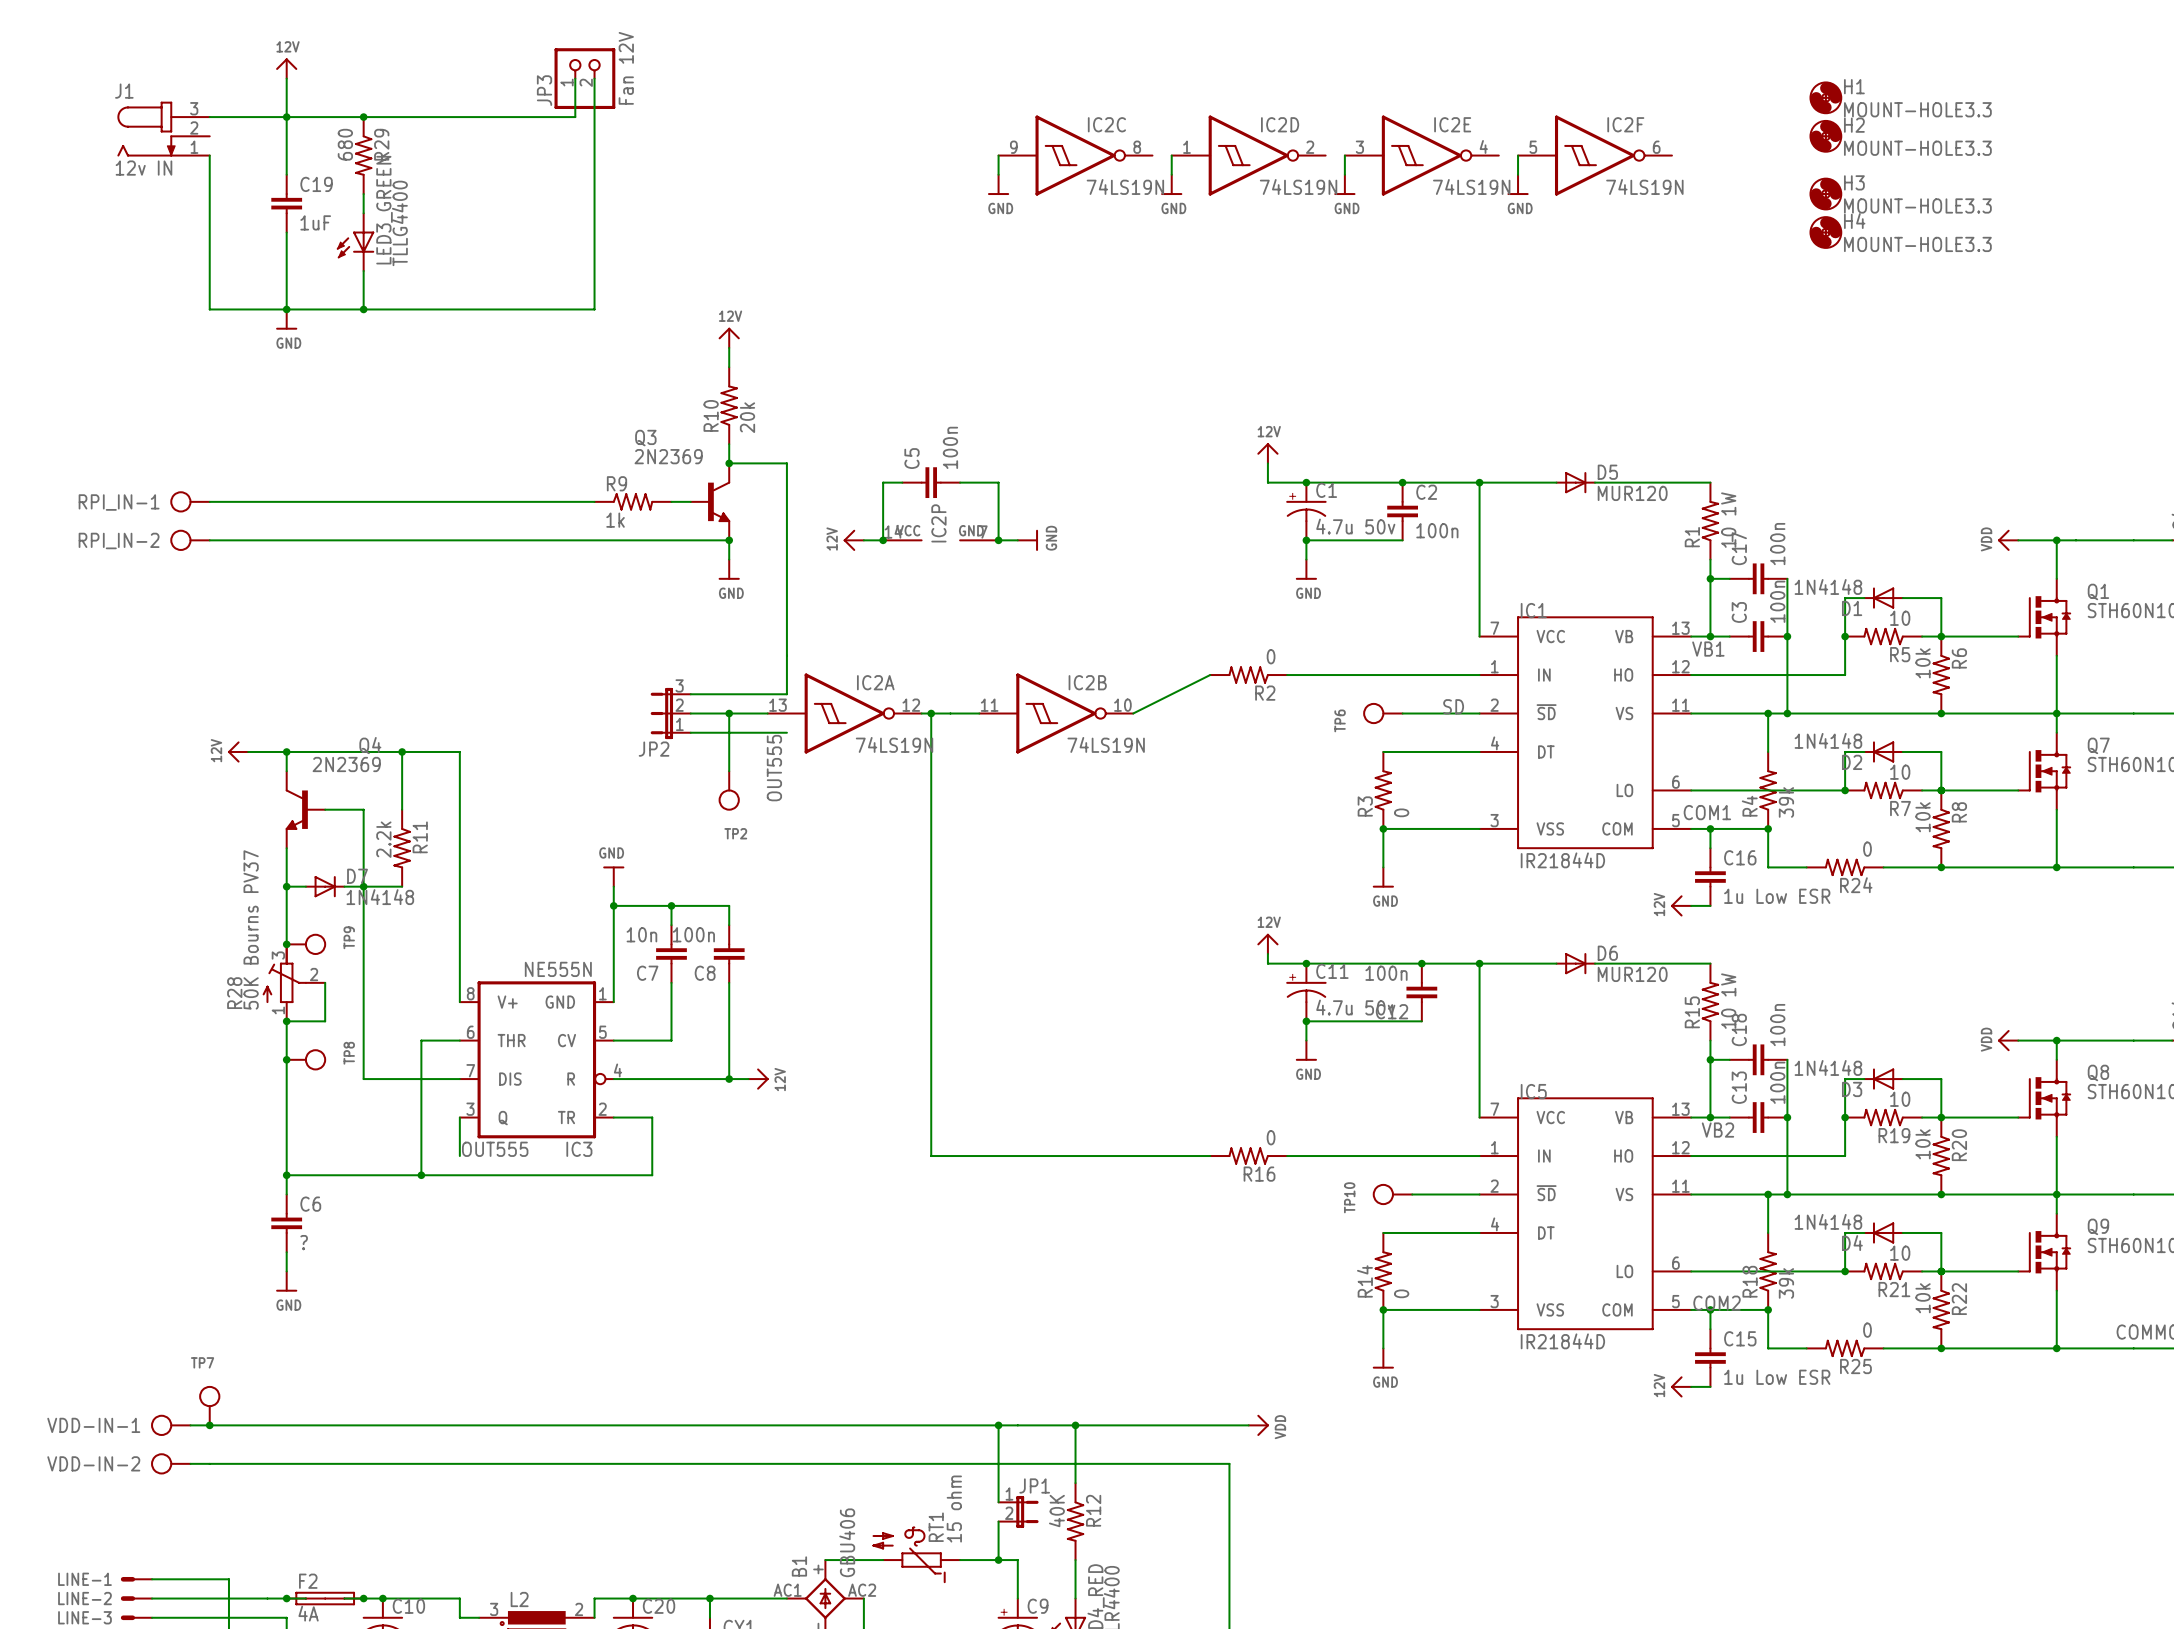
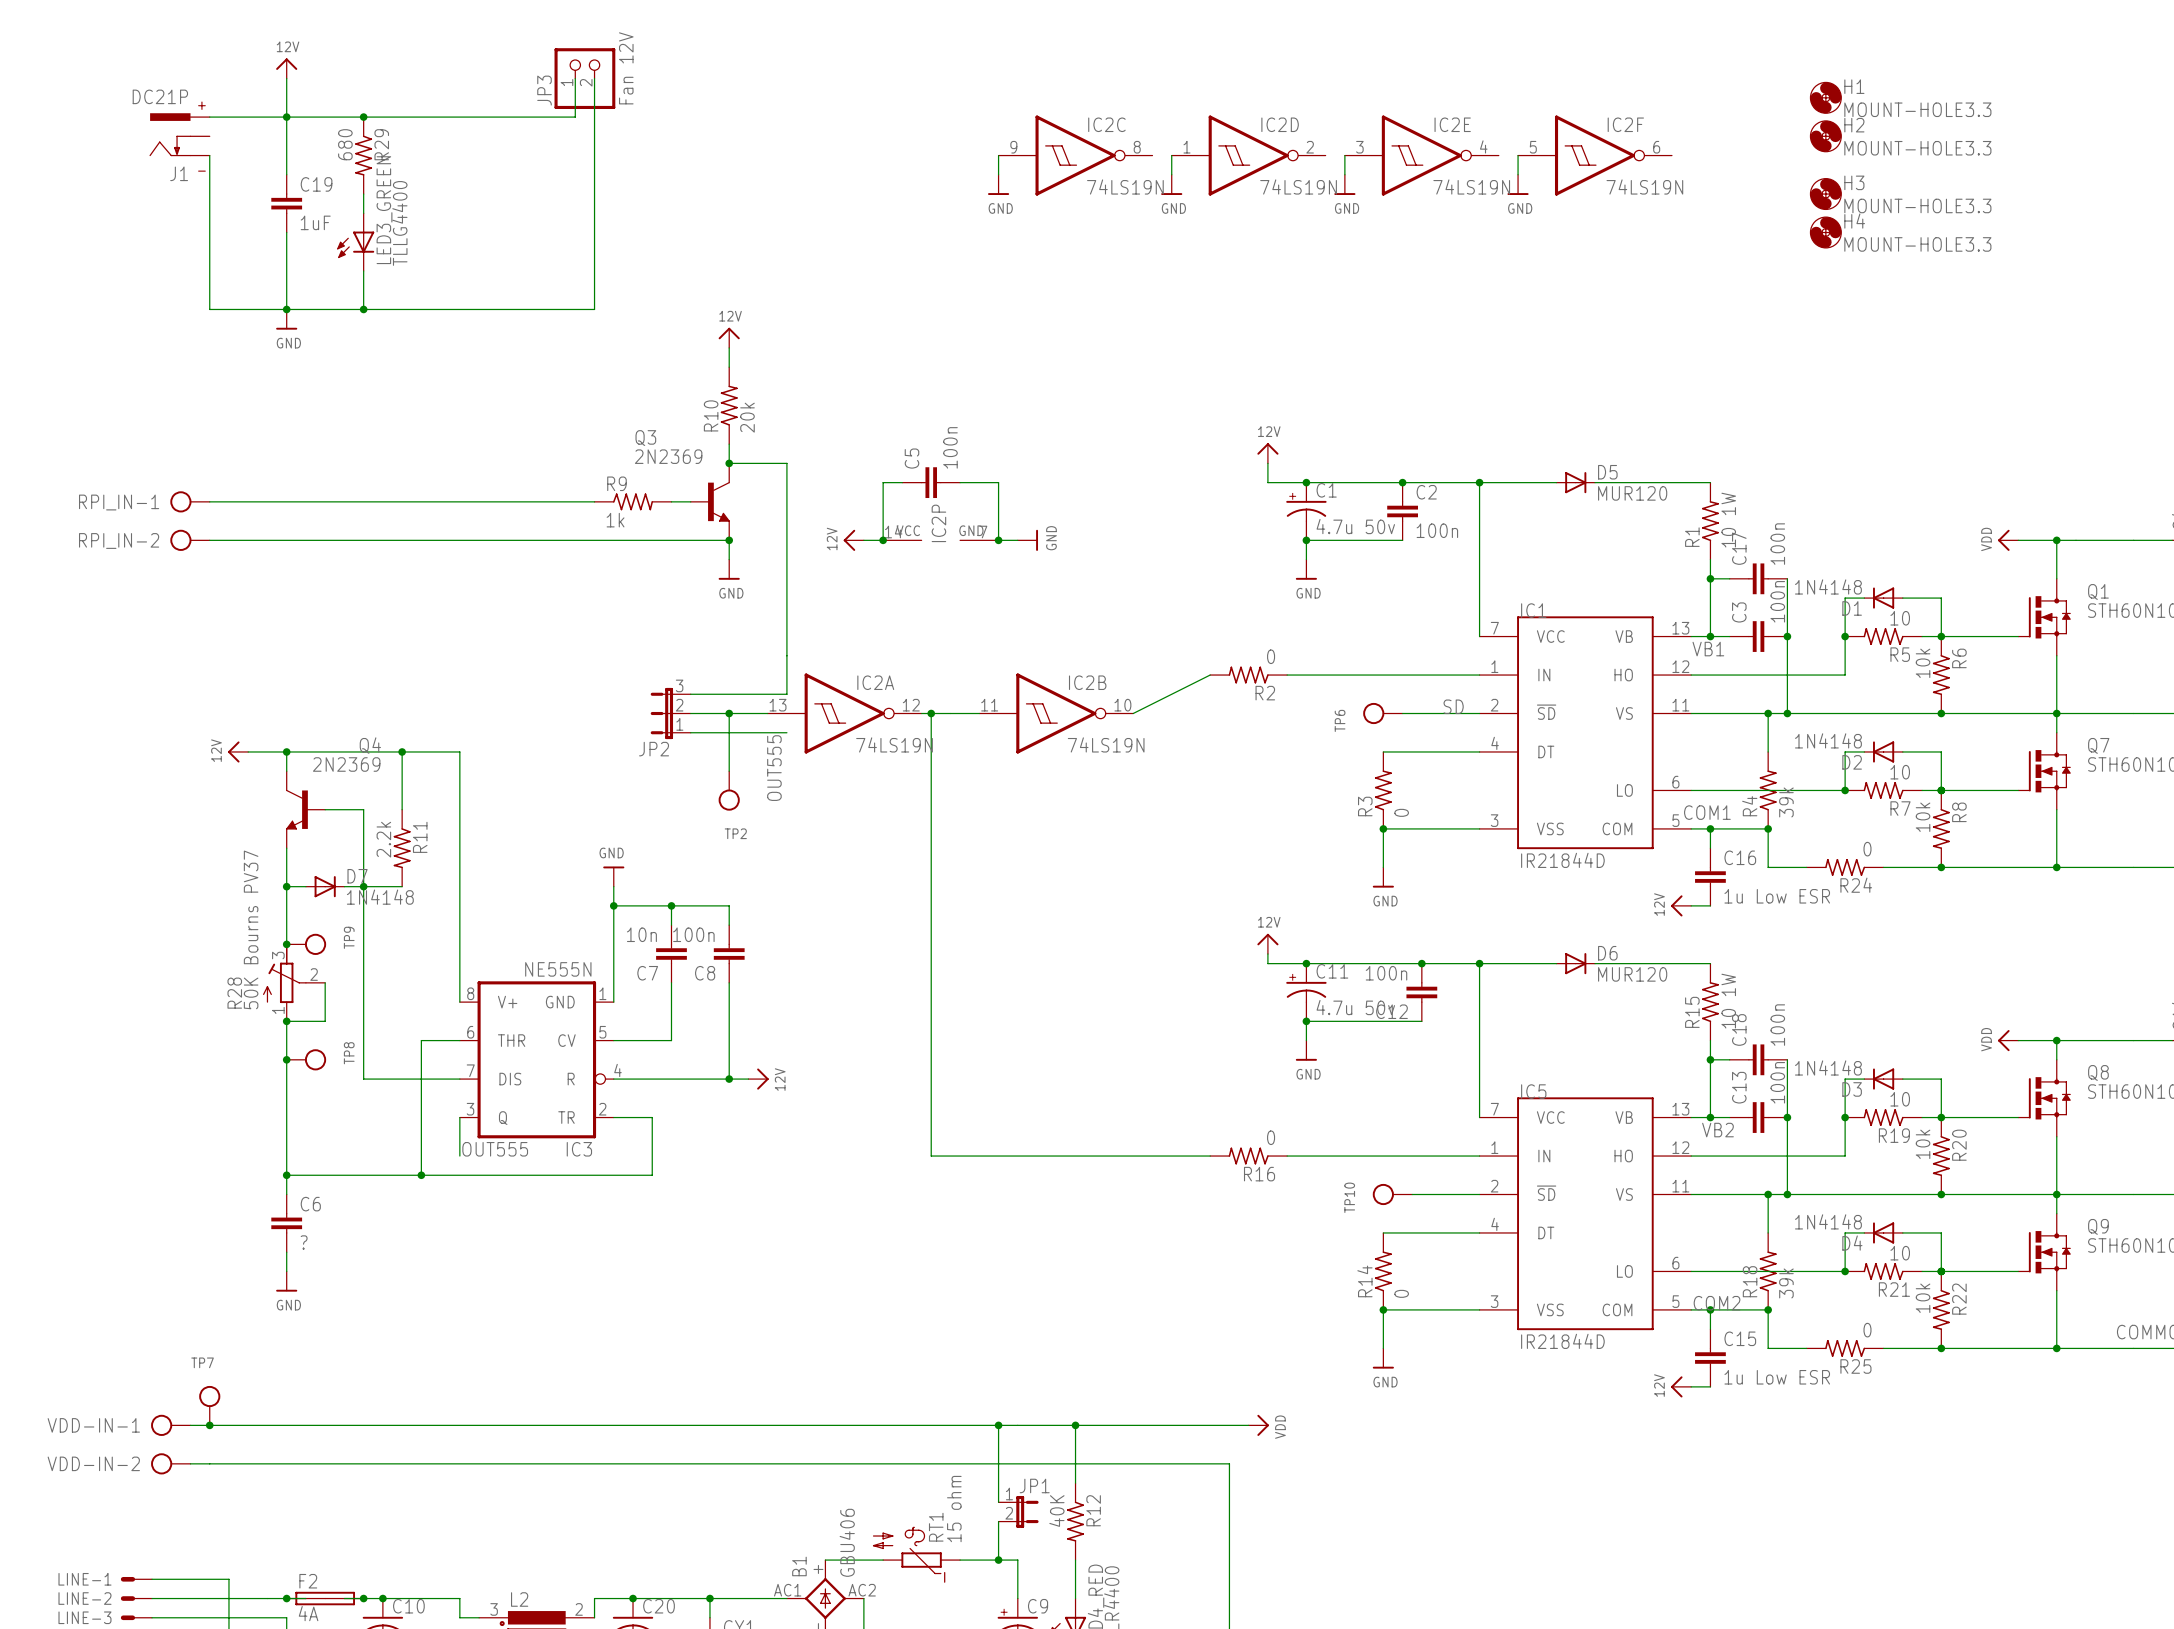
J1 name position: J1 (124, 91) -> J1 (179, 173)
J1 symbol: [117, 102, 210, 157] -> [149, 113, 210, 157]
J1 value: 12v IN (143, 168) -> DC21P (160, 96)

